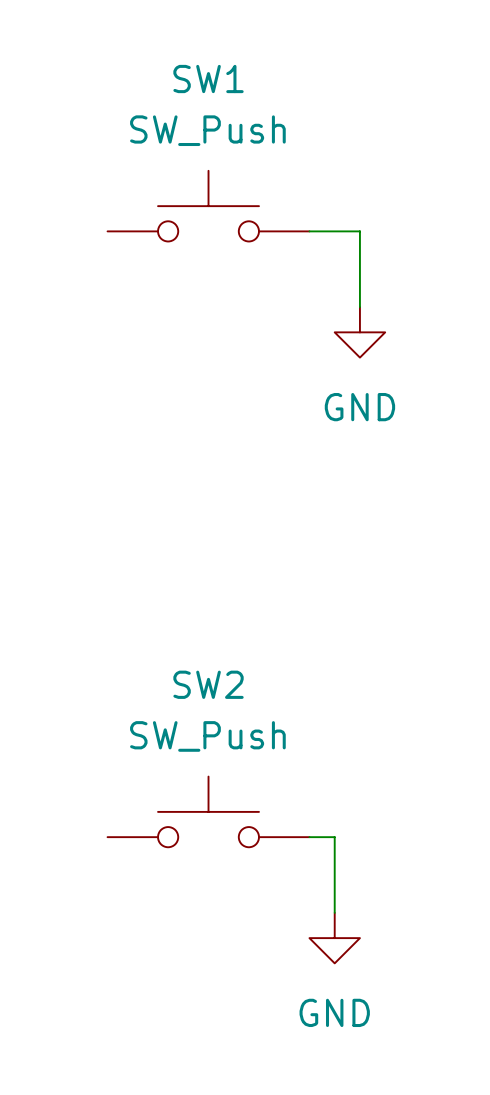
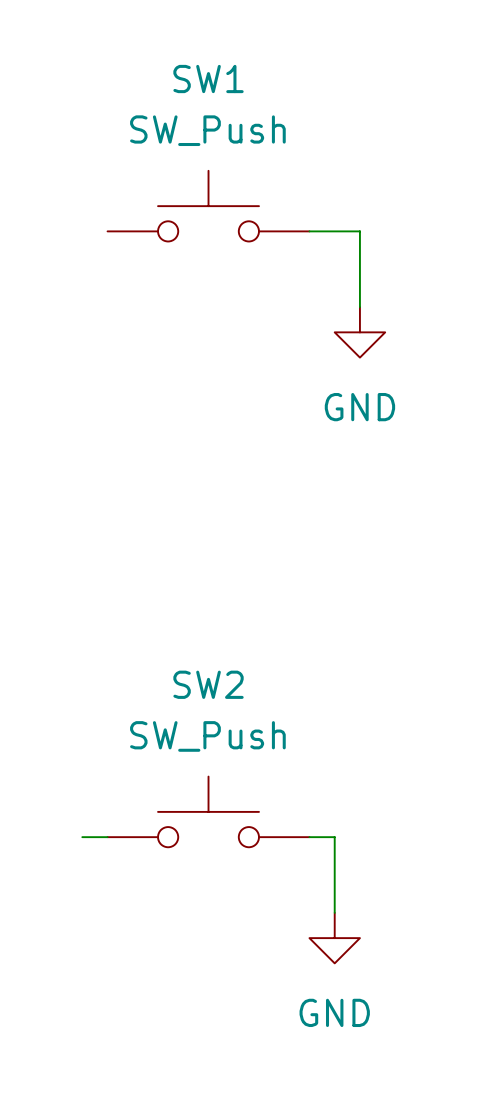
wire: none -> (82, 837) (107, 837)

